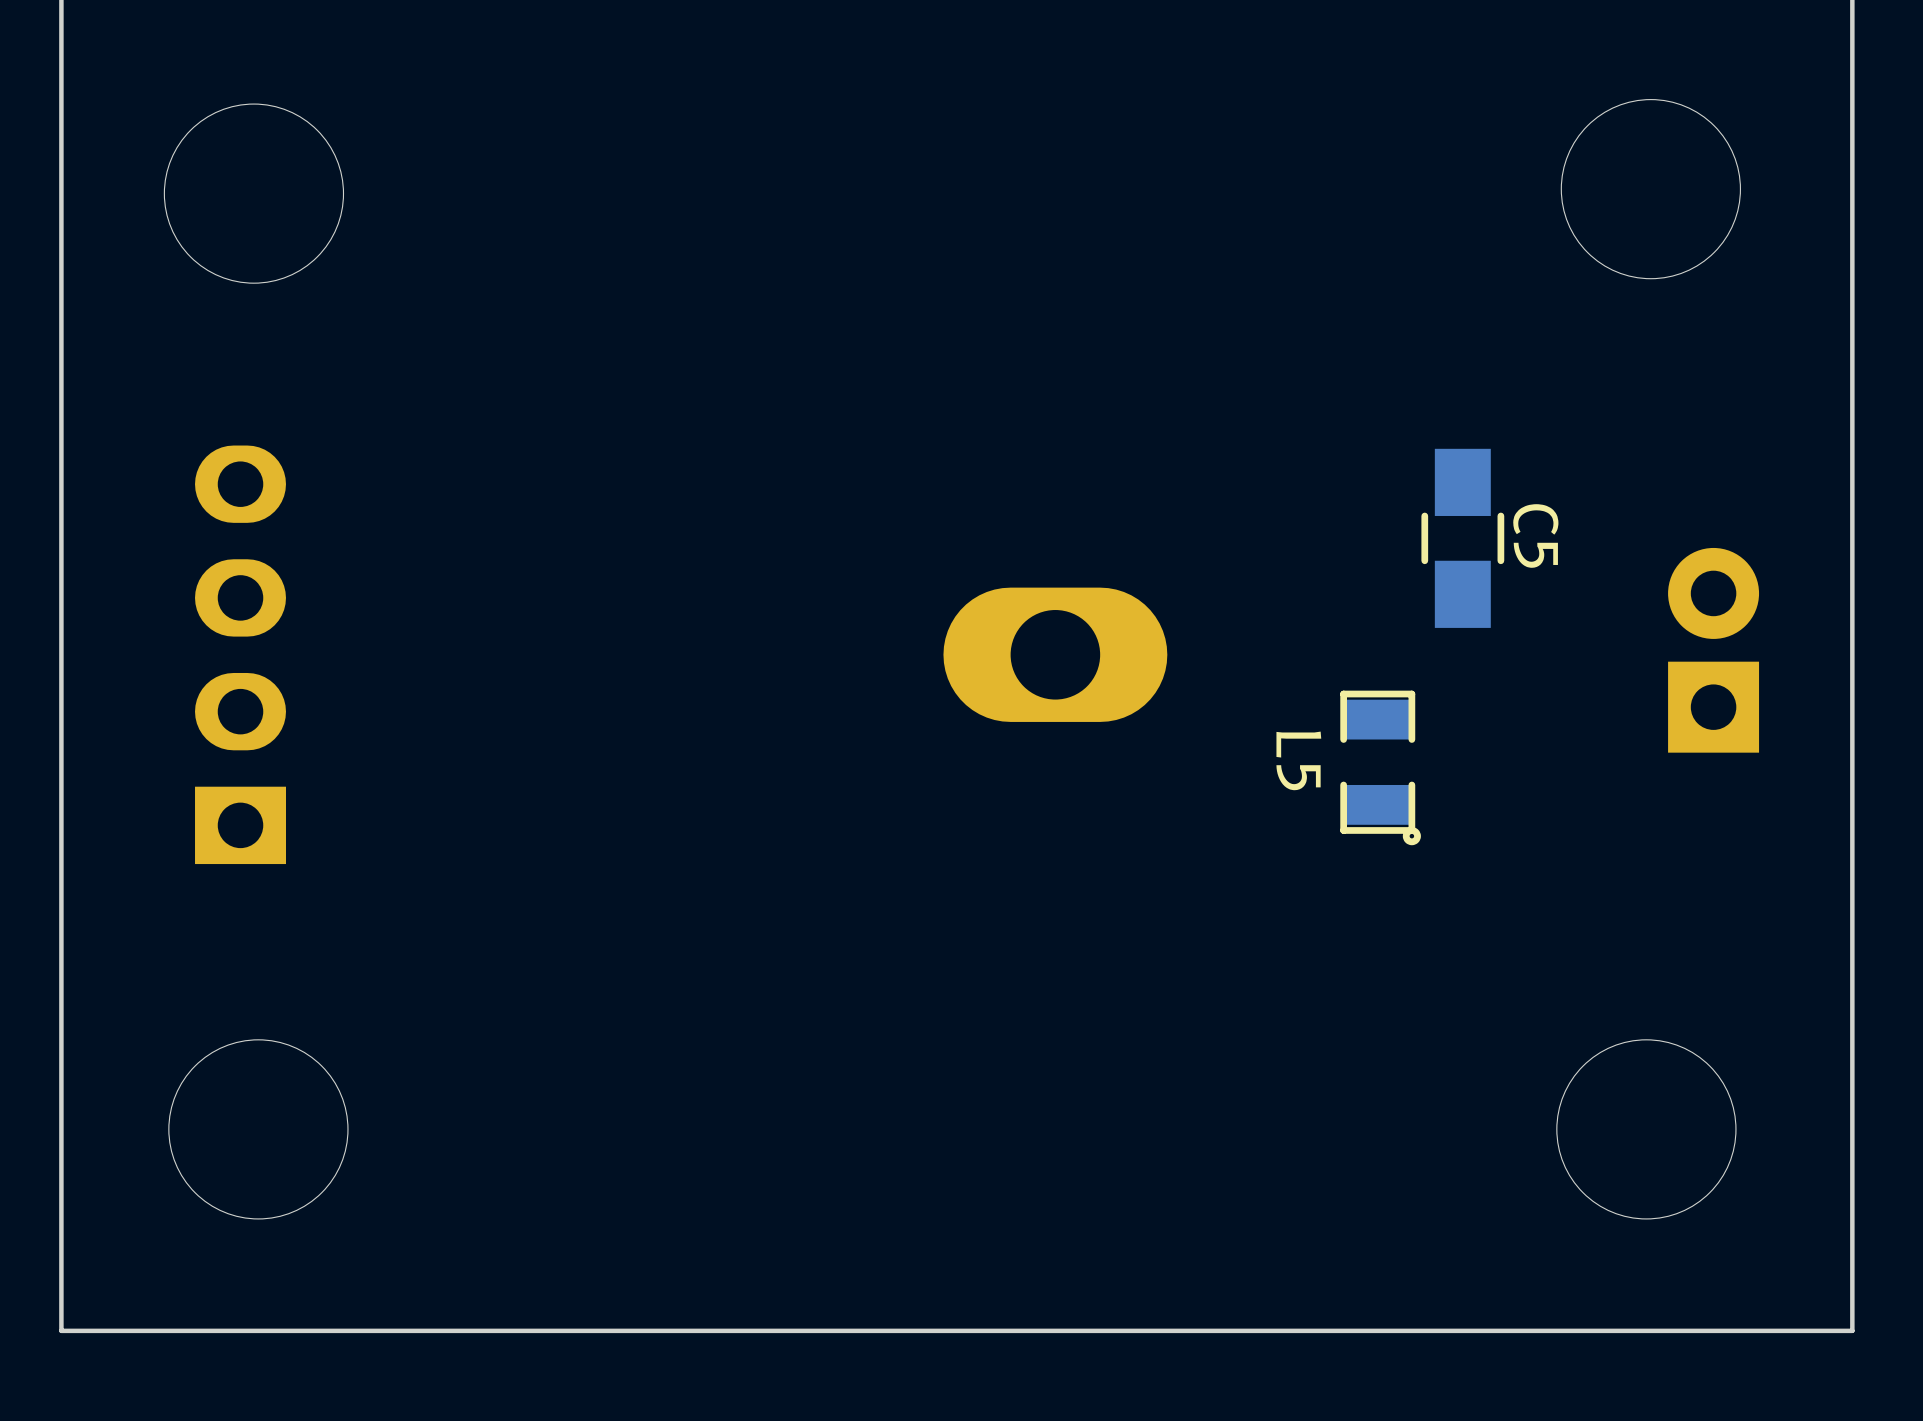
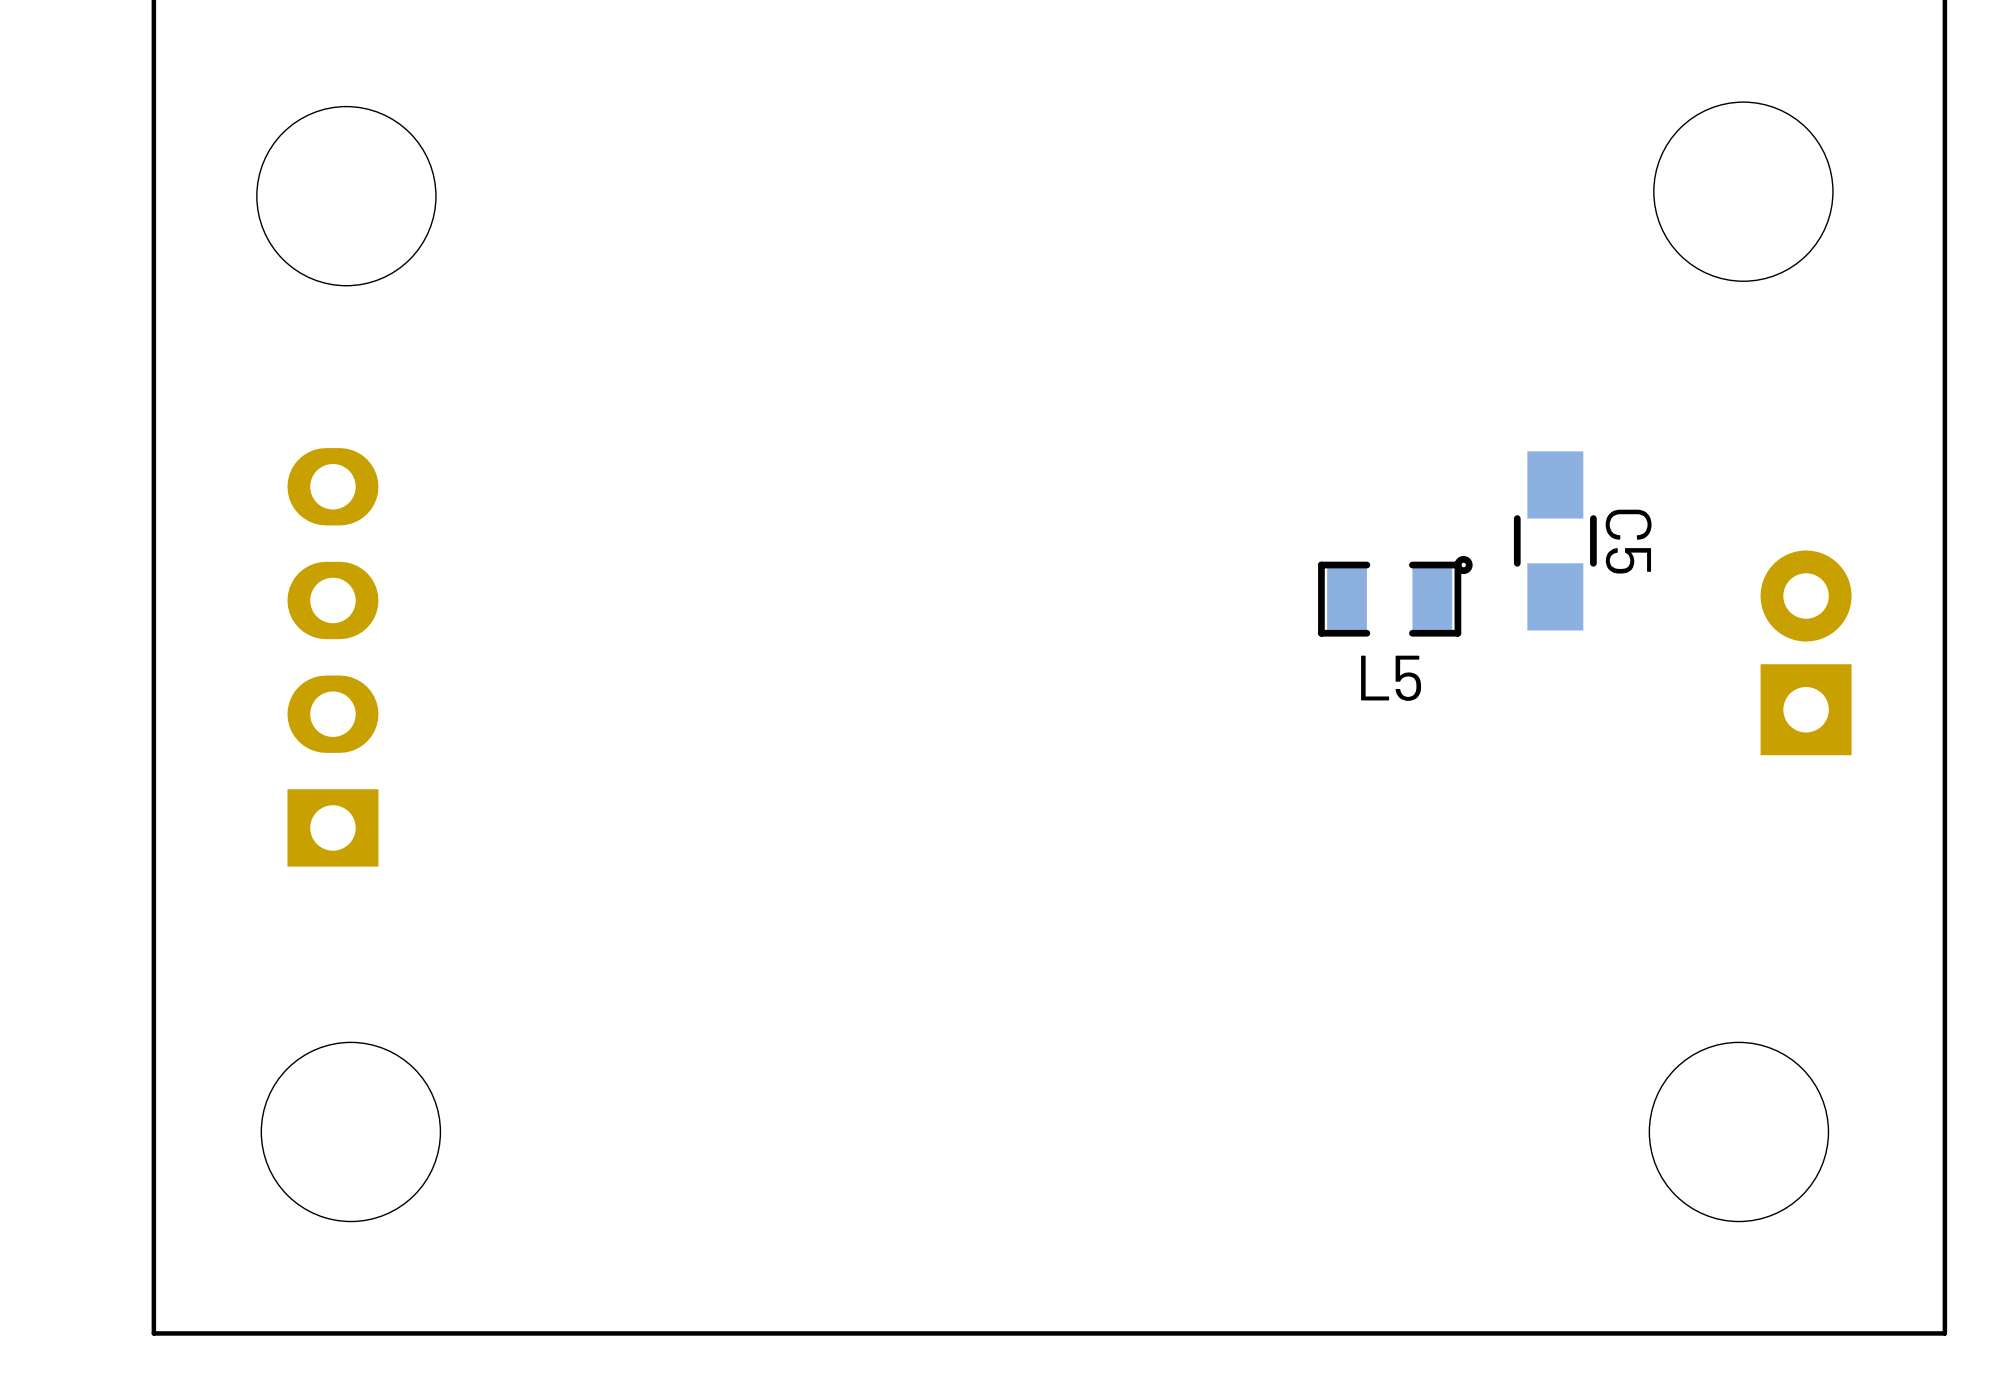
part: (1055, 654) -> none
L5 rotation: 0° (1380, 767) -> 90° counterclockwise (1395, 596)
L5 position: (1380, 767) -> (1395, 596)

